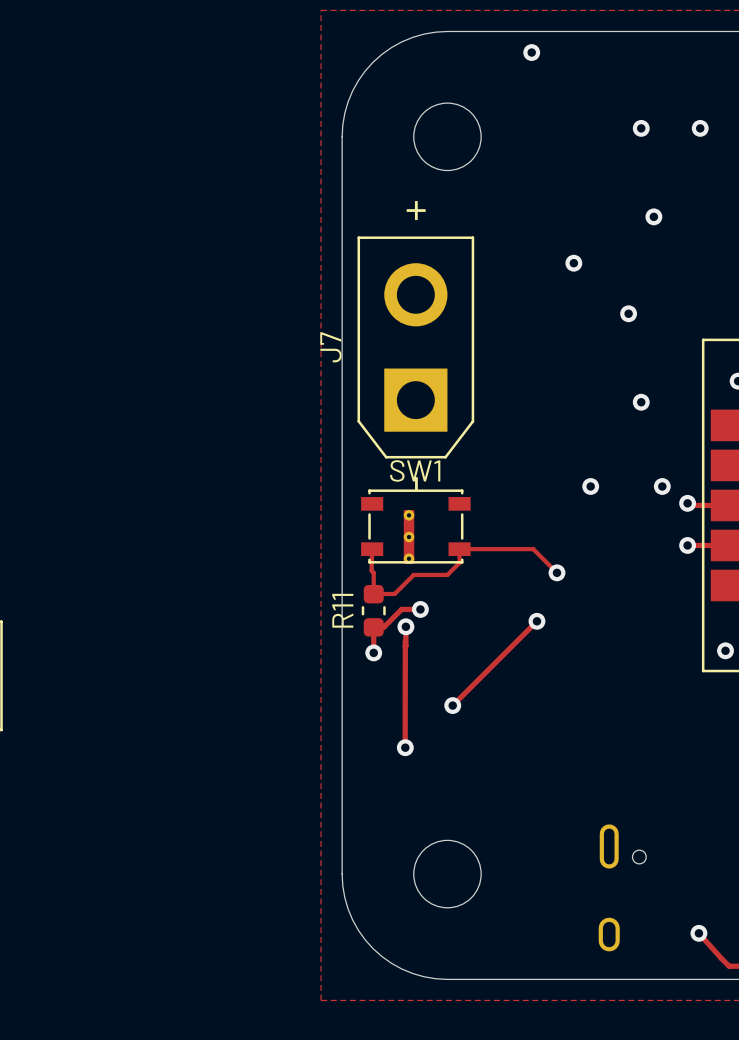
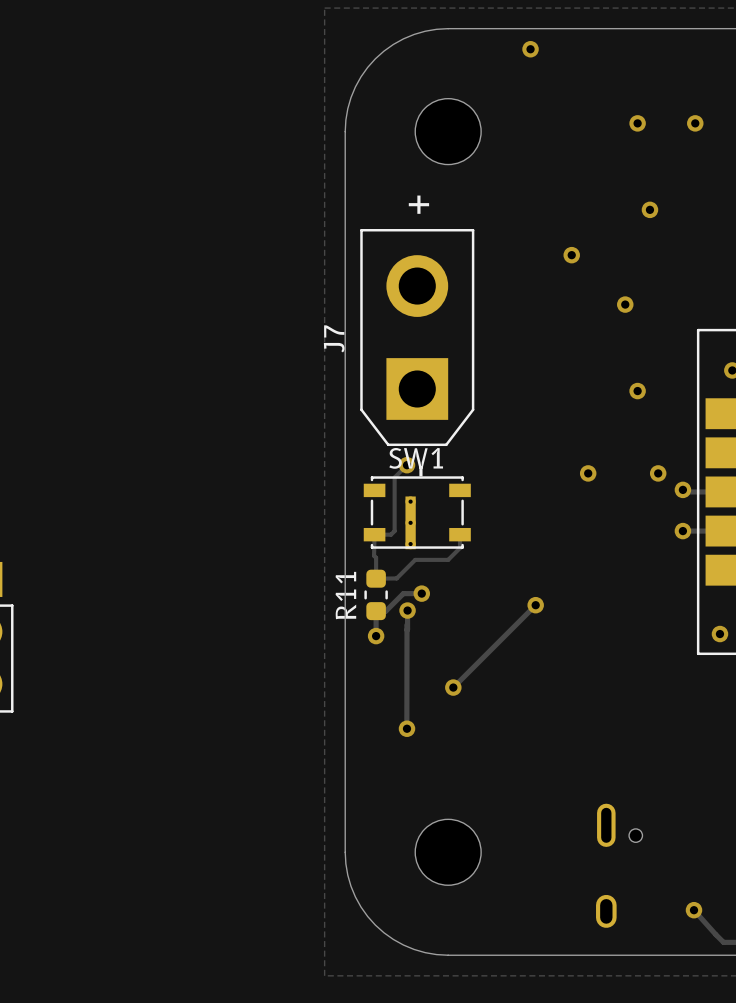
track: none -> (407, 465) (394, 477) (394, 531) (391, 534) (374, 534)
via: none -> (407, 465)
track: (459, 549) (533, 549) (556, 572) -> none
via: (556, 572) -> none

